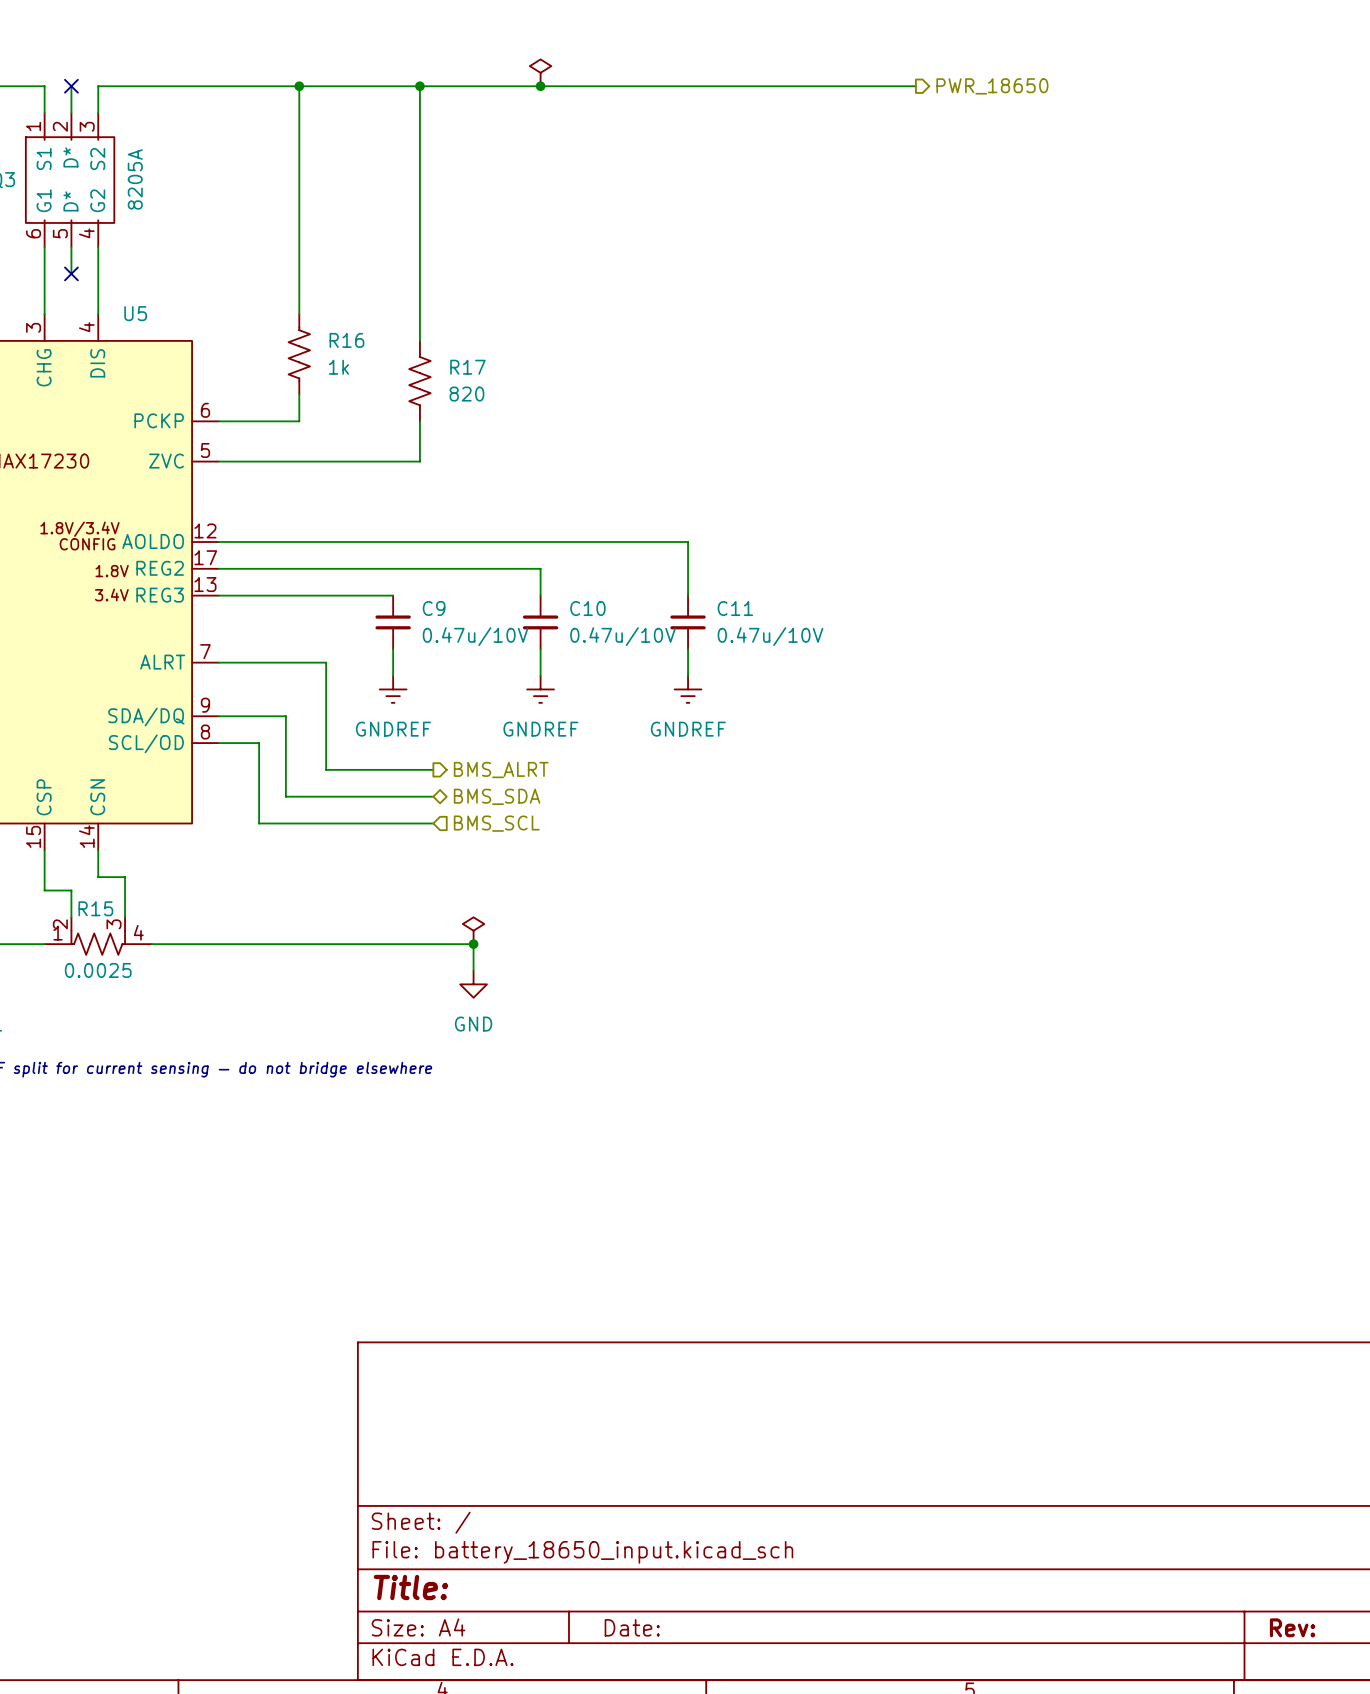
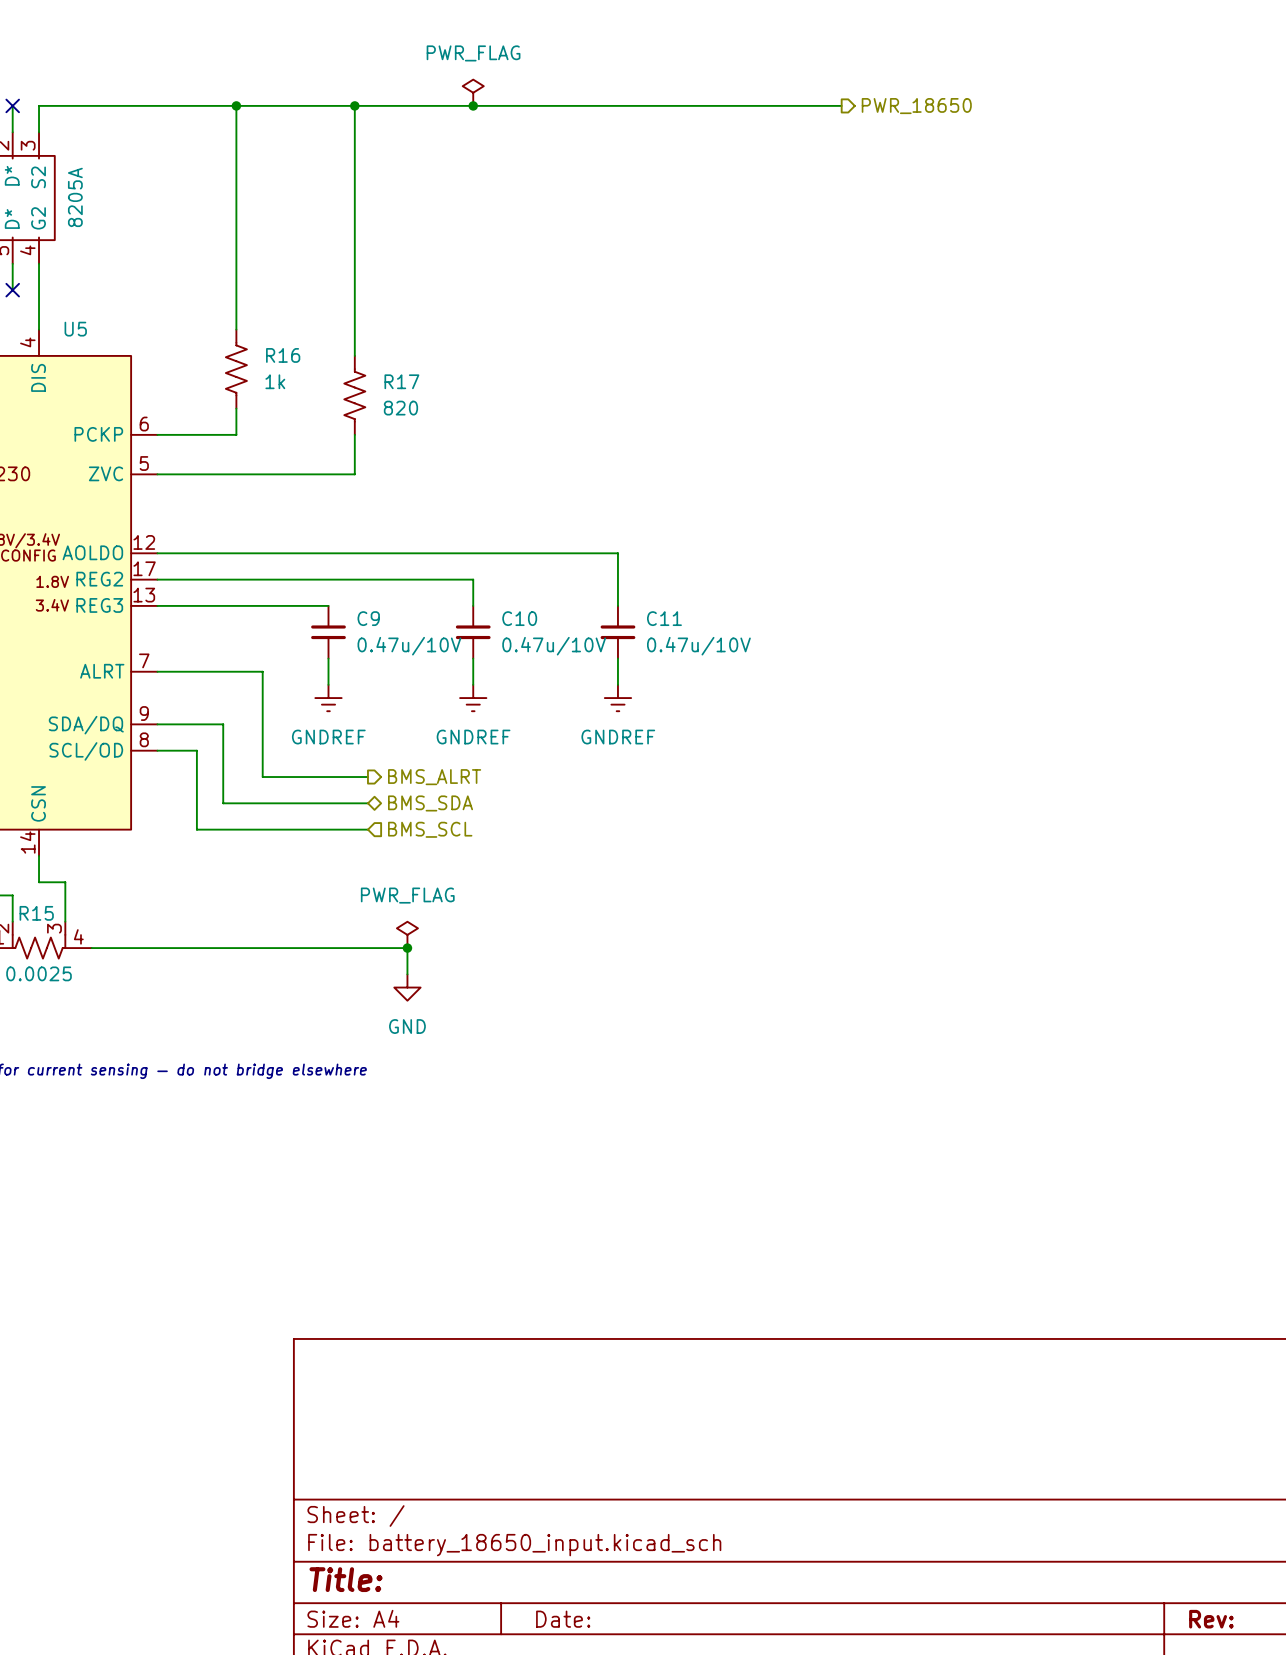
power symbol text: none -> PWR_FLAG (473, 53)
power symbol text: none -> PWR_FLAG (407, 895)

